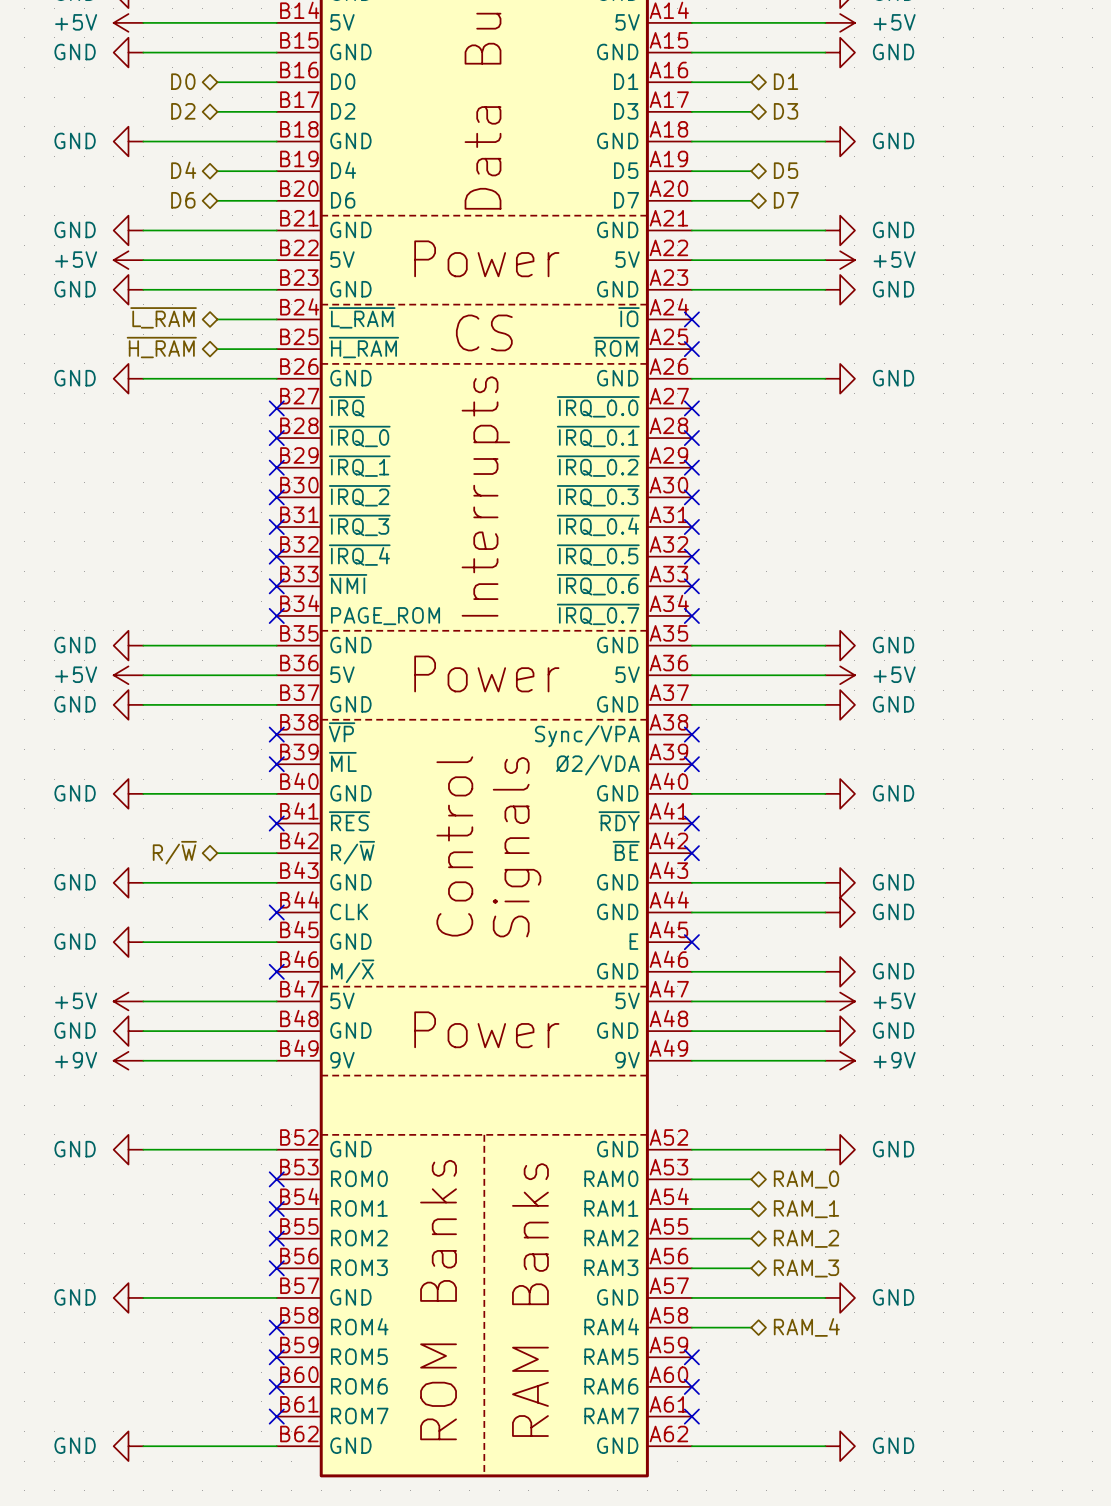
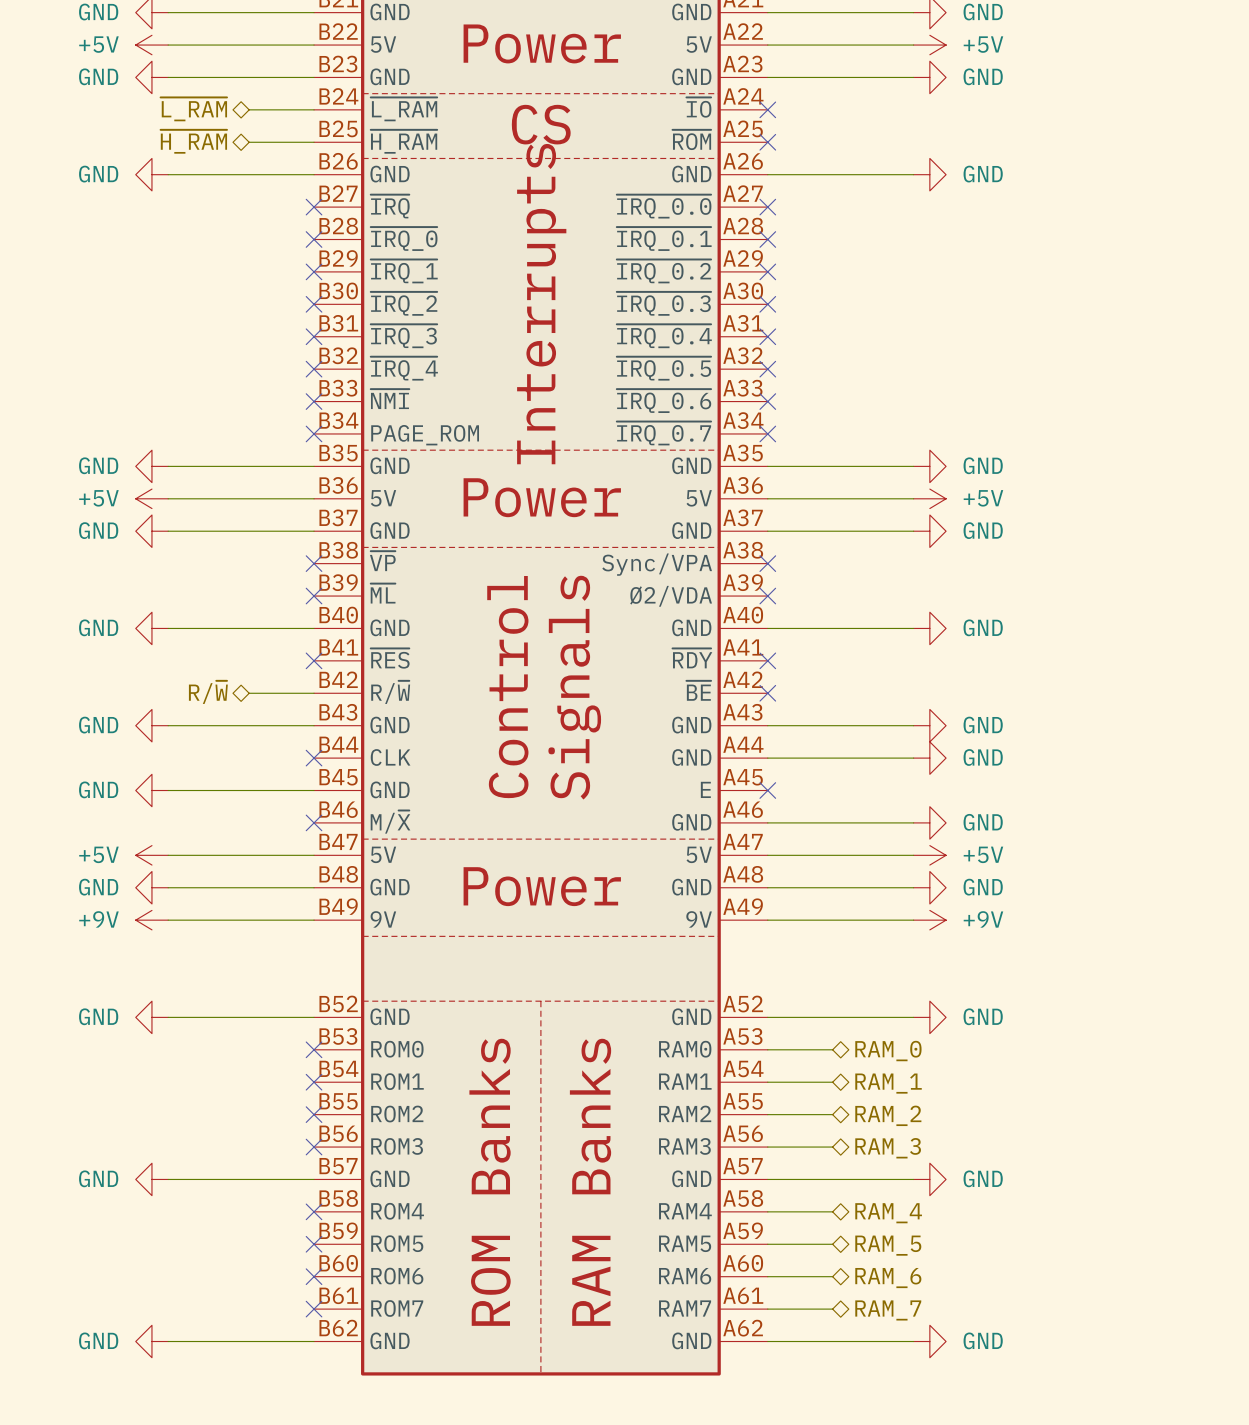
wire: none -> (767, 1244) (832, 1244)
no-connect mark: (691, 1357) -> none
hierarchical label: none -> RAM_5 (888, 1245)
wire: none -> (767, 1276) (832, 1276)
no-connect mark: (691, 1386) -> none
hierarchical label: none -> RAM_6 (888, 1278)
wire: none -> (767, 1309) (832, 1309)
no-connect mark: (691, 1416) -> none
hierarchical label: none -> RAM_7 (888, 1310)

